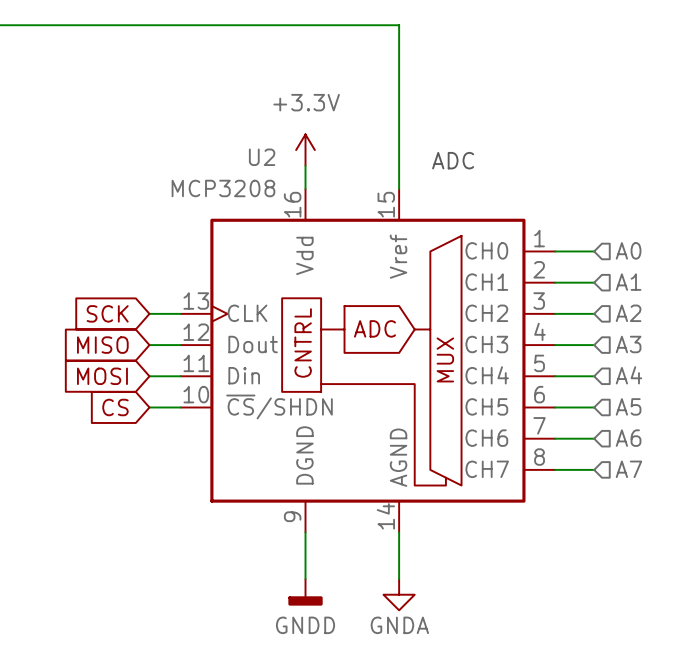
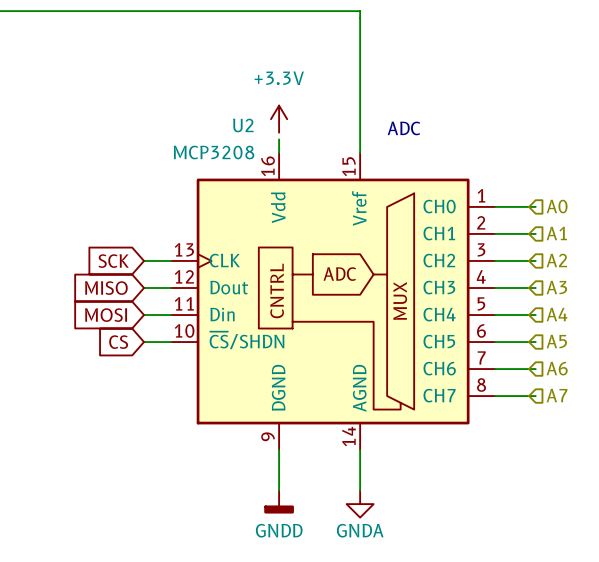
wire: (305, 165) (305, 173) -> none
wire: none -> (528, 206) (535, 206)
wire: none -> (528, 233) (535, 233)
wire: none -> (528, 260) (535, 260)
wire: none -> (528, 288) (535, 288)
wire: none -> (528, 315) (535, 315)
wire: none -> (528, 342) (535, 342)
wire: none -> (528, 369) (535, 369)
wire: none -> (528, 396) (535, 396)

